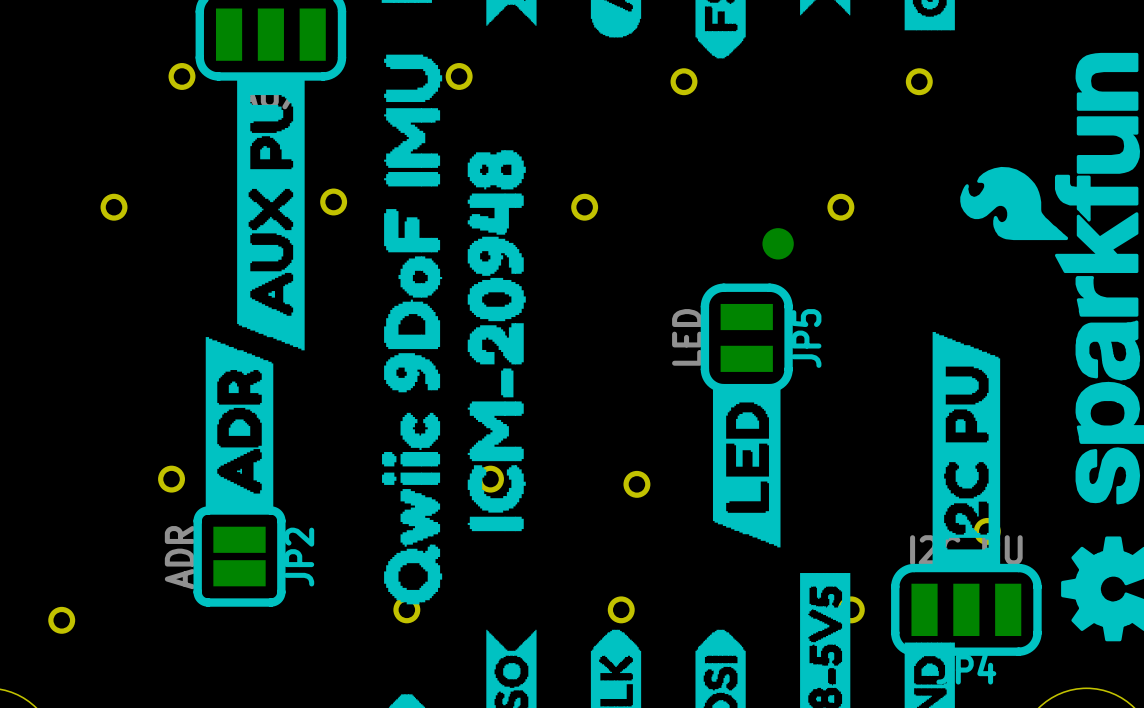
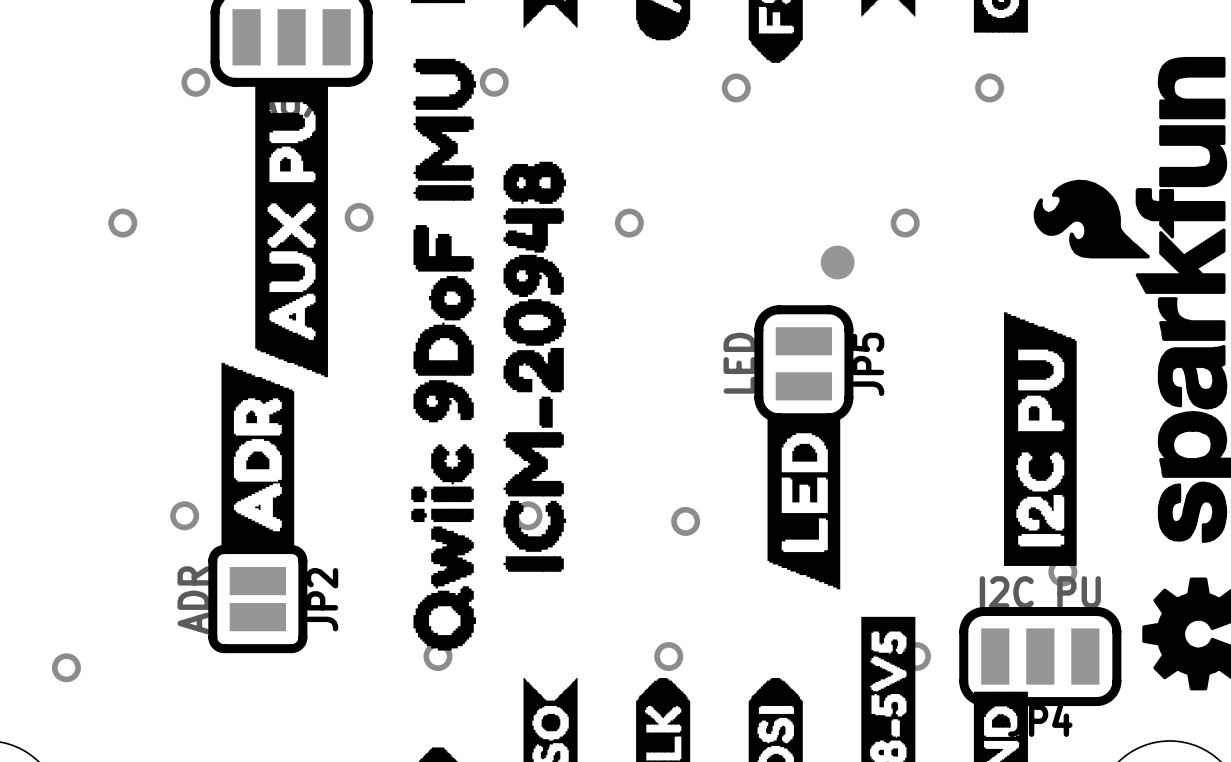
drawing position: (966, 449) -> (1040, 439)

